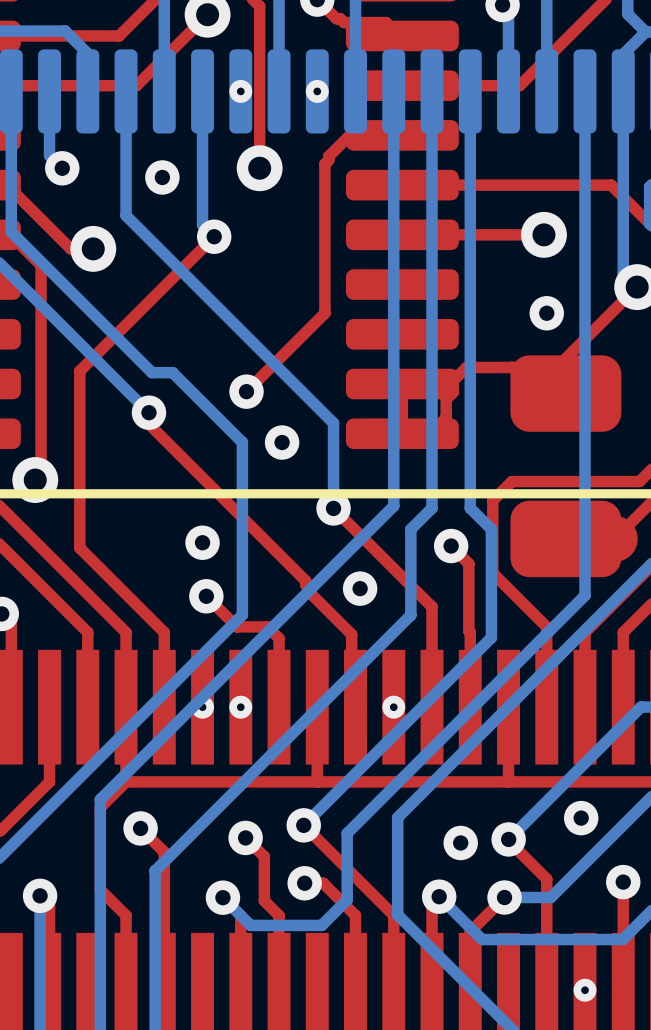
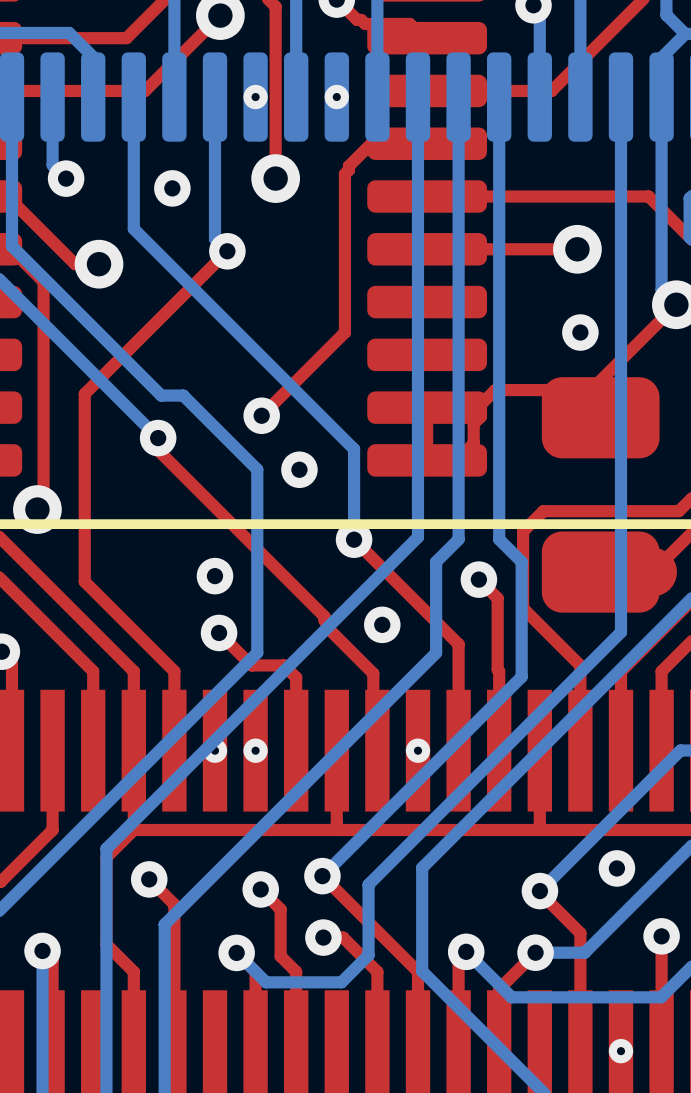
via: (460, 842) -> none

